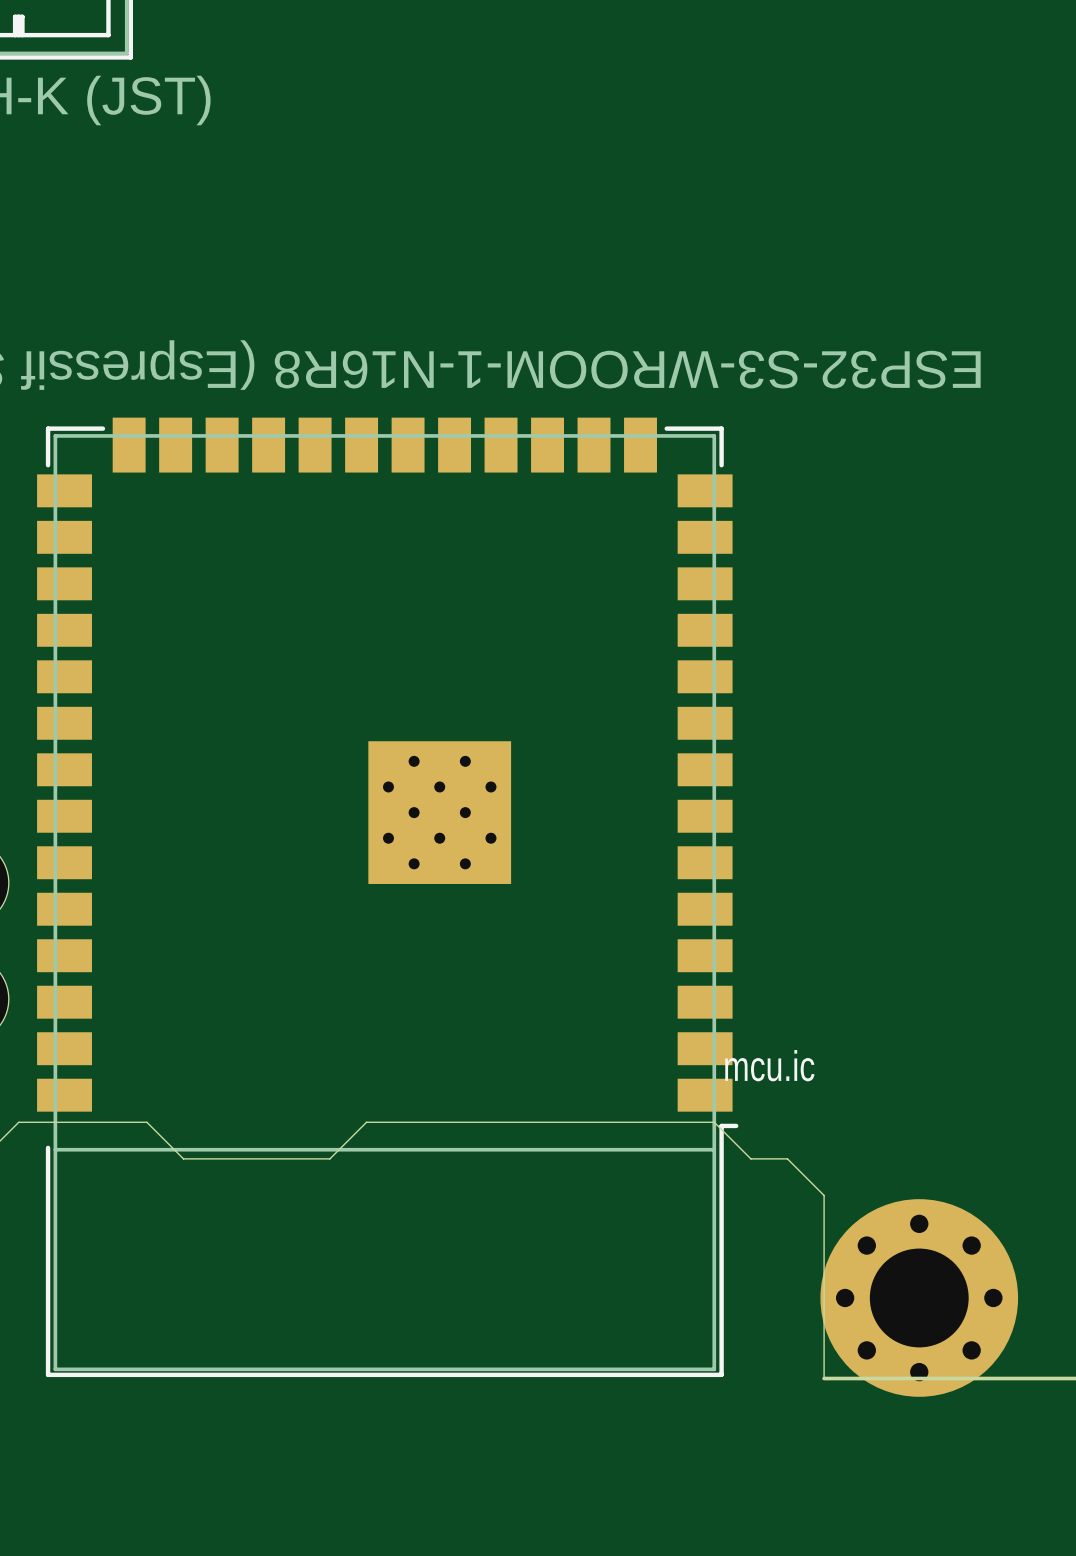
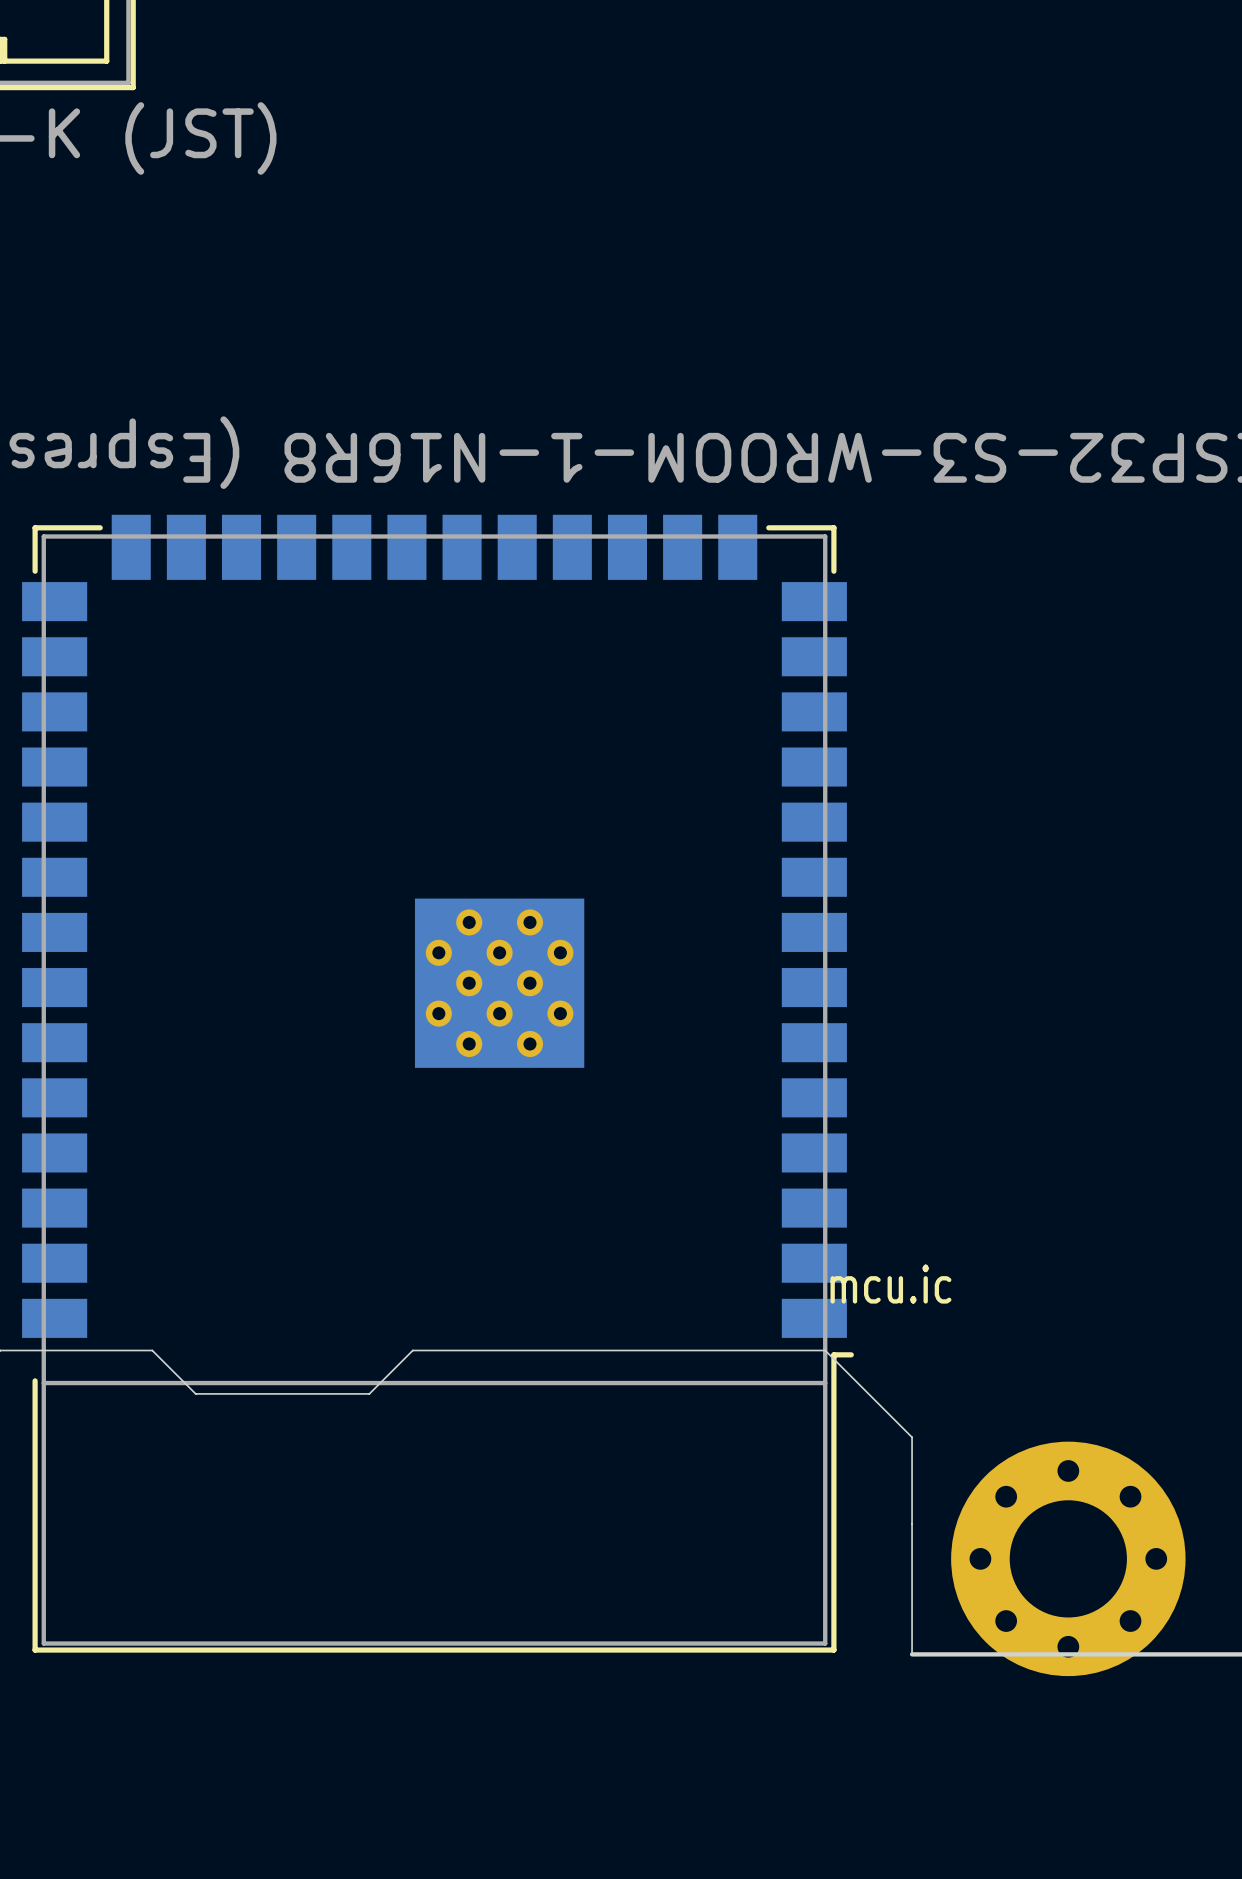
board edge: (750, 1158) (787, 1158) (824, 1195) (824, 1378) -> (868, 1393) (912, 1437) (912, 1654) (955, 1654)

